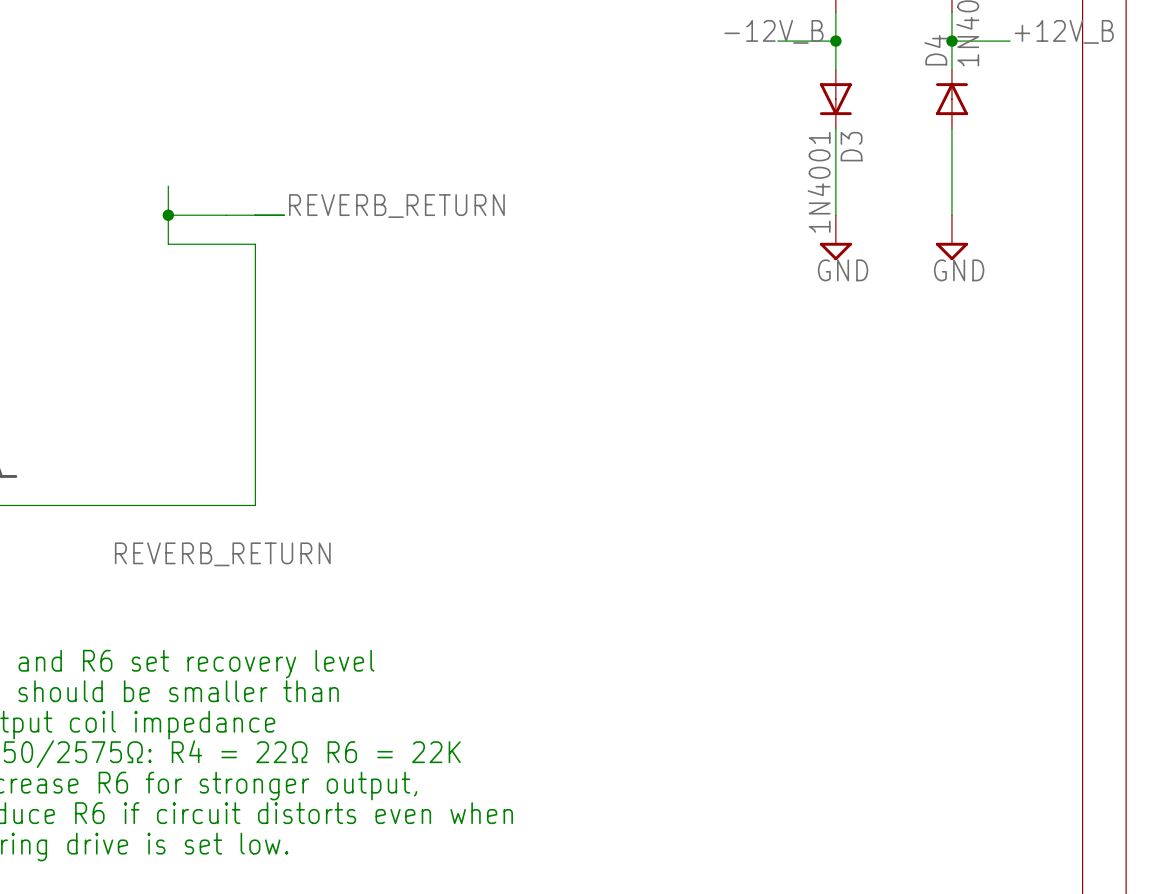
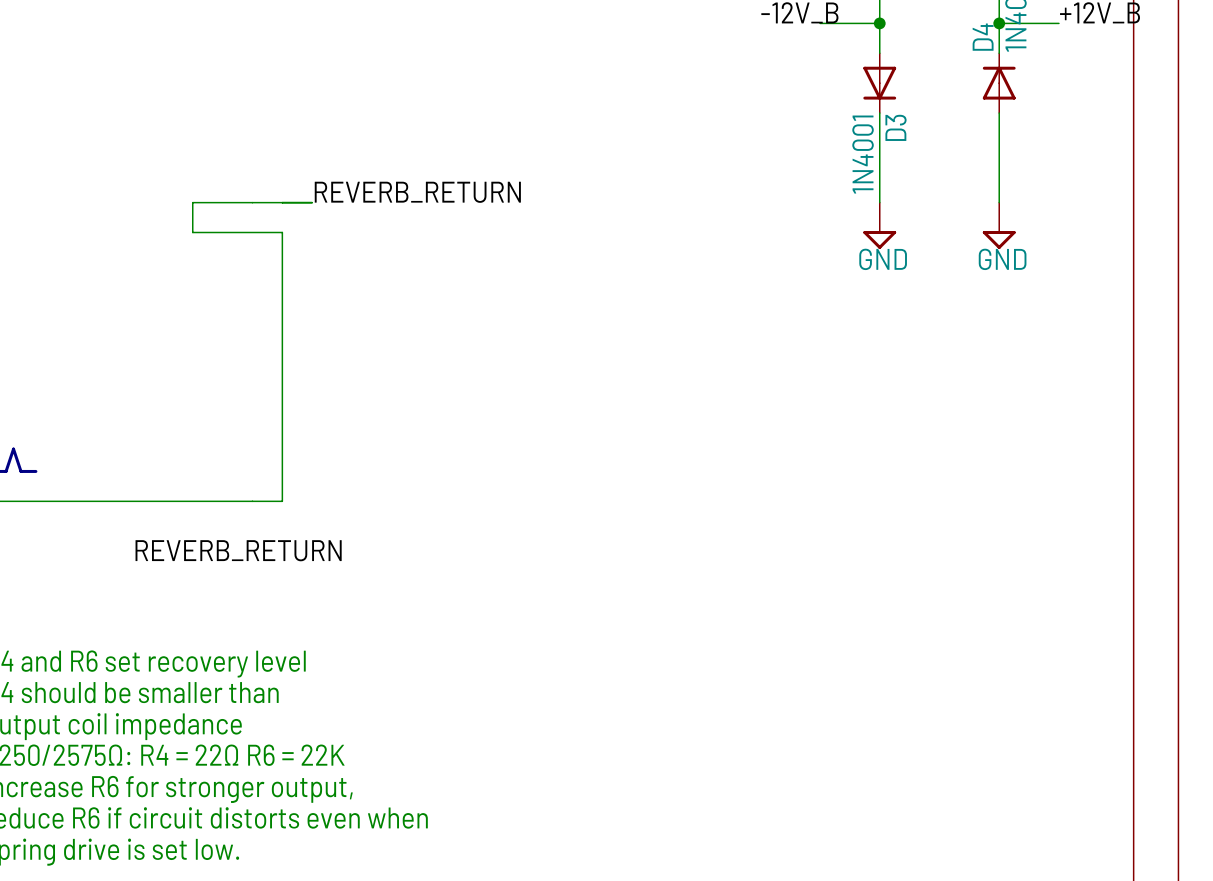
wire: (168, 186) (168, 215) -> none
junction: (168, 215) -> none

